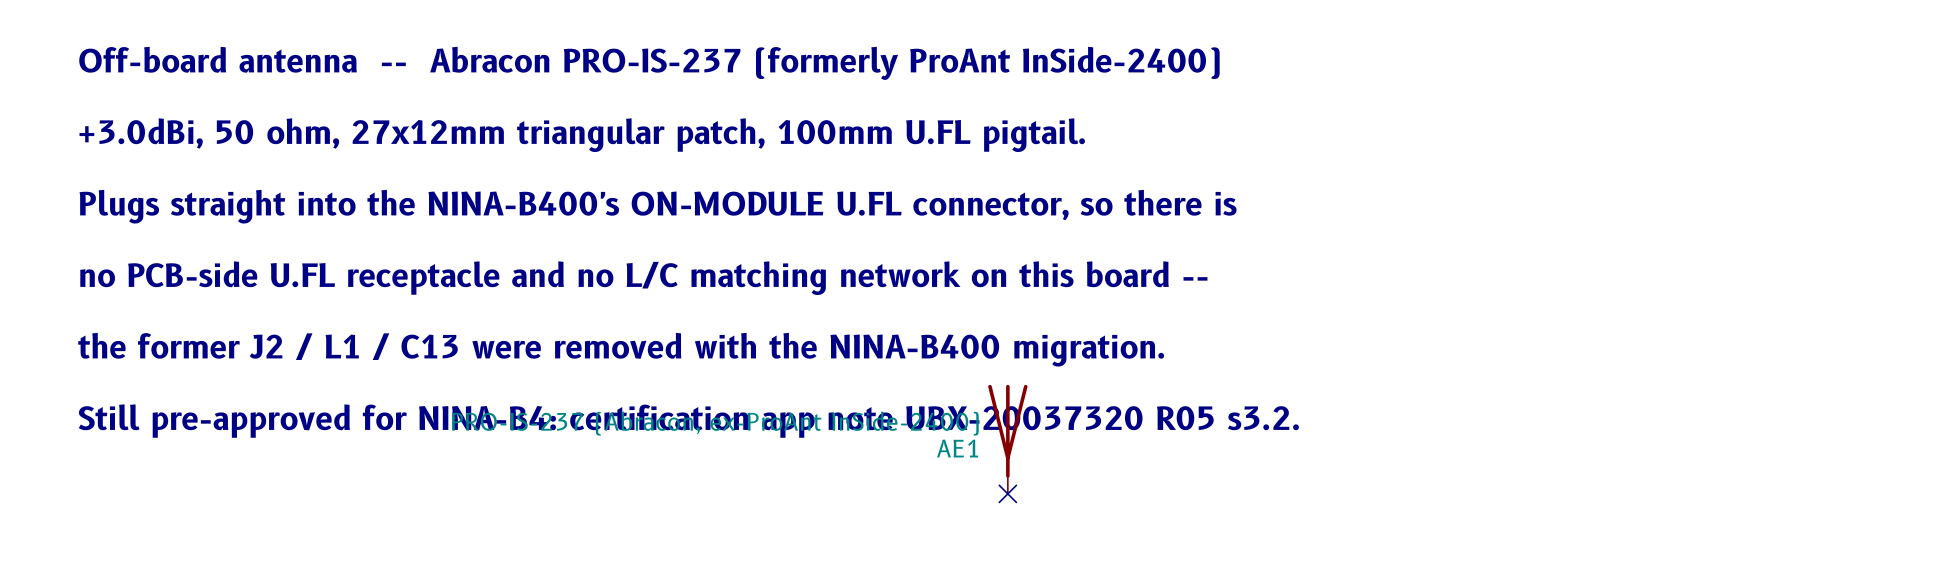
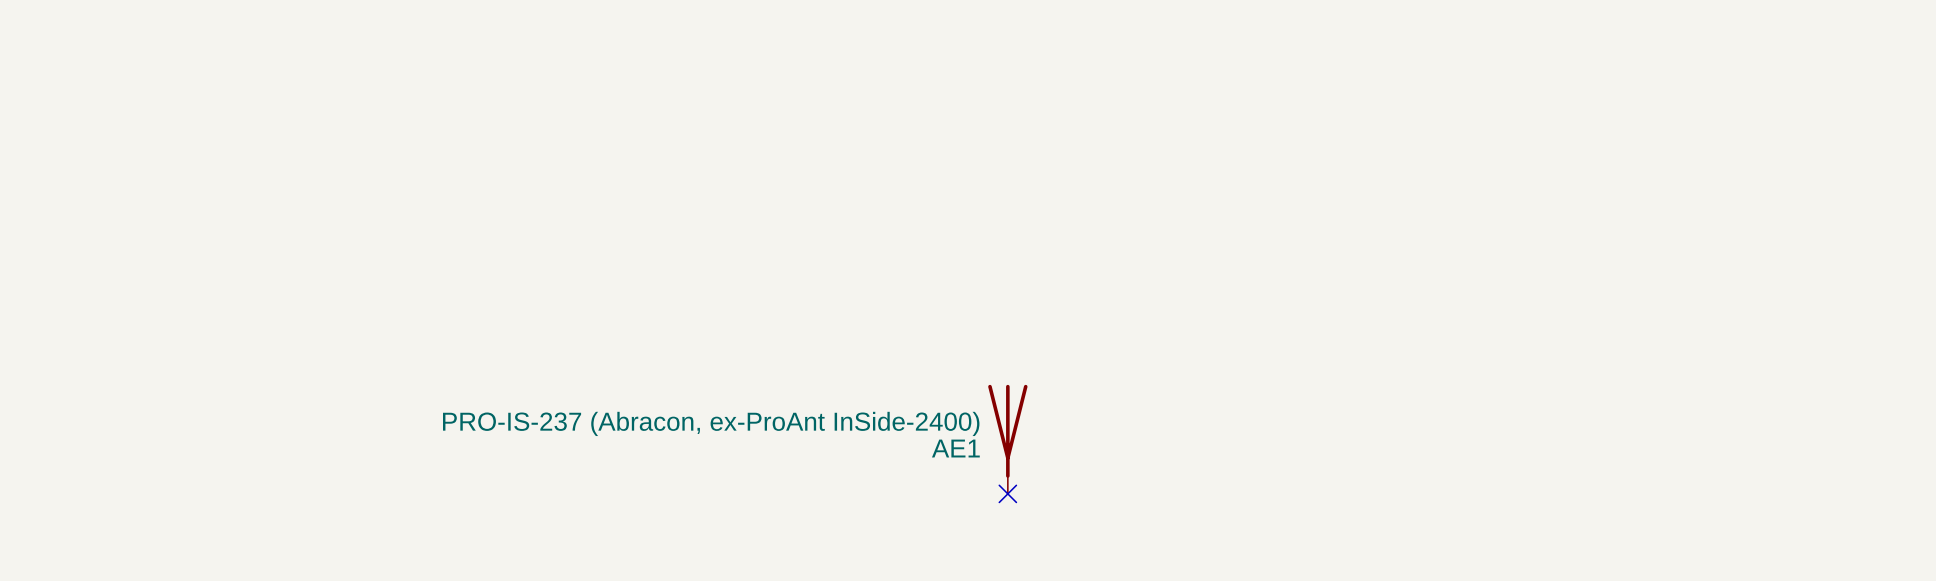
text: Off-board antenna -- Abracon PRO-IS-237 (formerly ProAnt InSide-2400) (649, 63) -> none
text: +3.0dBi, 50 ohm, 27x12mm triangular patch, 100mm U.FL pigtail. (582, 135) -> none
text: Plugs straight into the NINA-B400's ON-MODULE U.FL connector, so there is (658, 206) -> none
text: no PCB-side U.FL receptacle and no L/C matching network on this board -- (643, 278) -> none
text: the former J2 / L1 / C13 were removed with the NINA-B400 migration. (621, 349) -> none
text: Still pre-approved for NINA-B4: certification app note UBX-20037320 R05 s3.2. (688, 421) -> none

